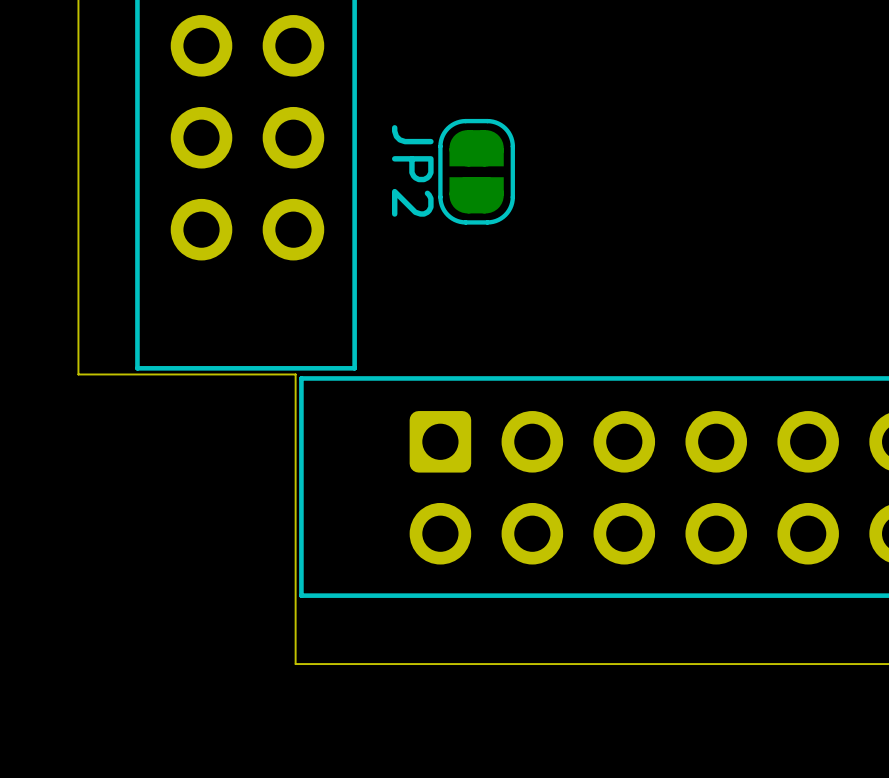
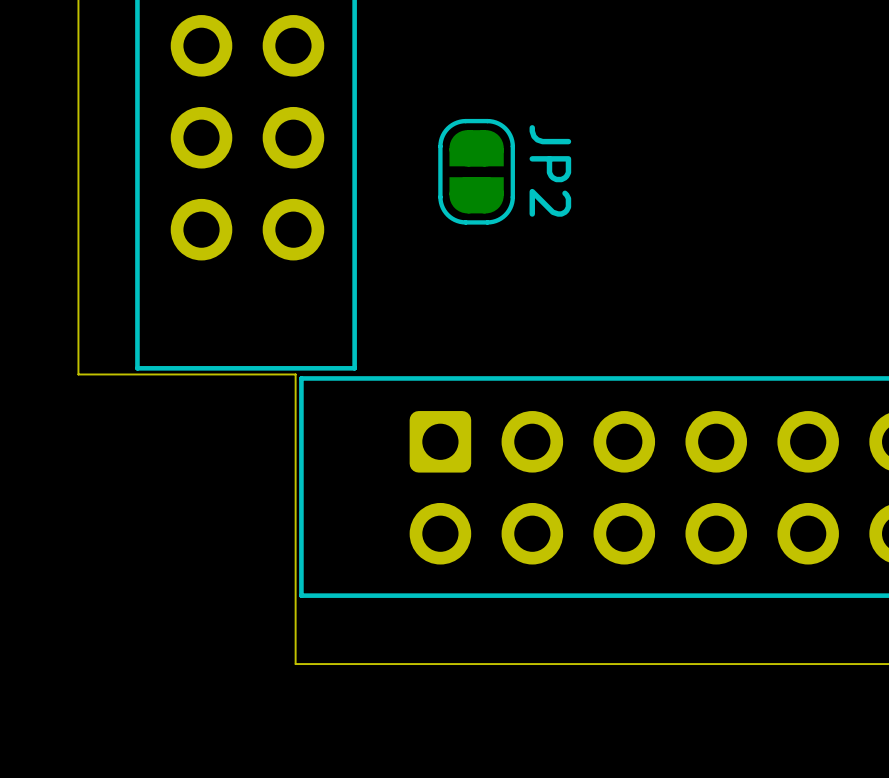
JP2 name position: JP2 (412, 170) -> JP2 (550, 170)

